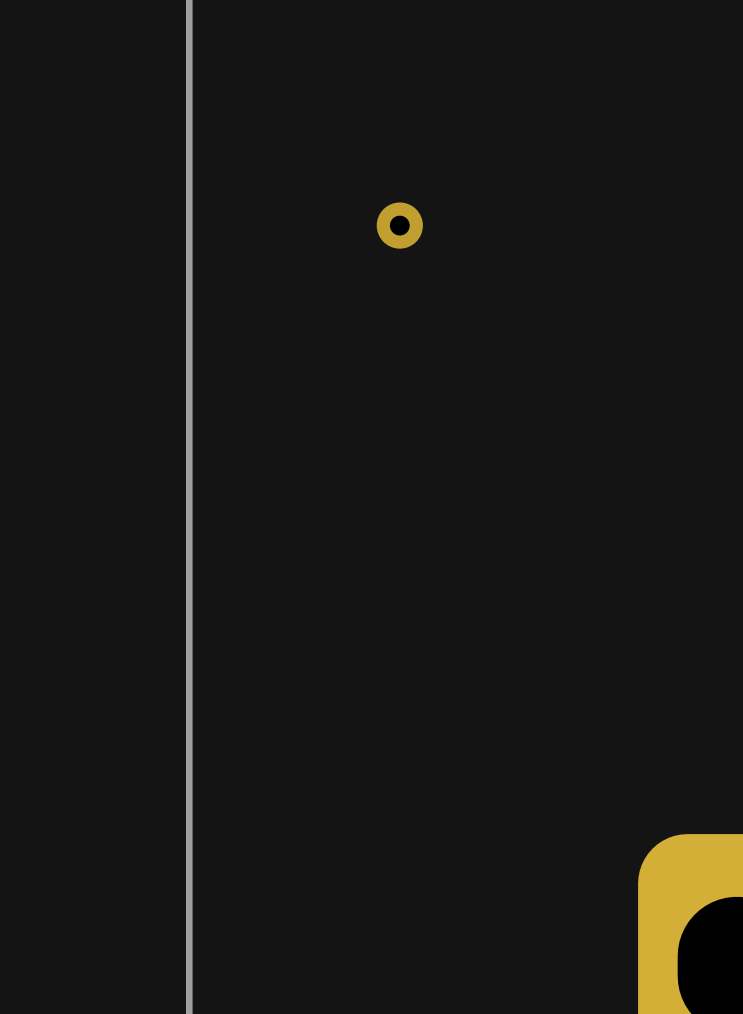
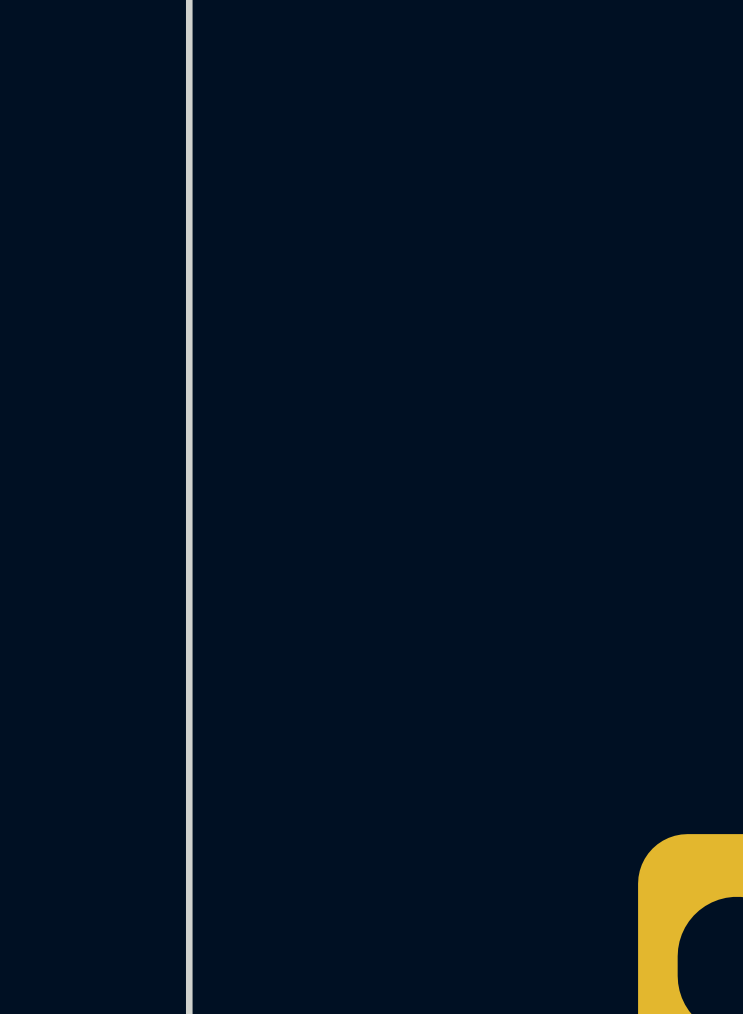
via: (399, 225) -> none

